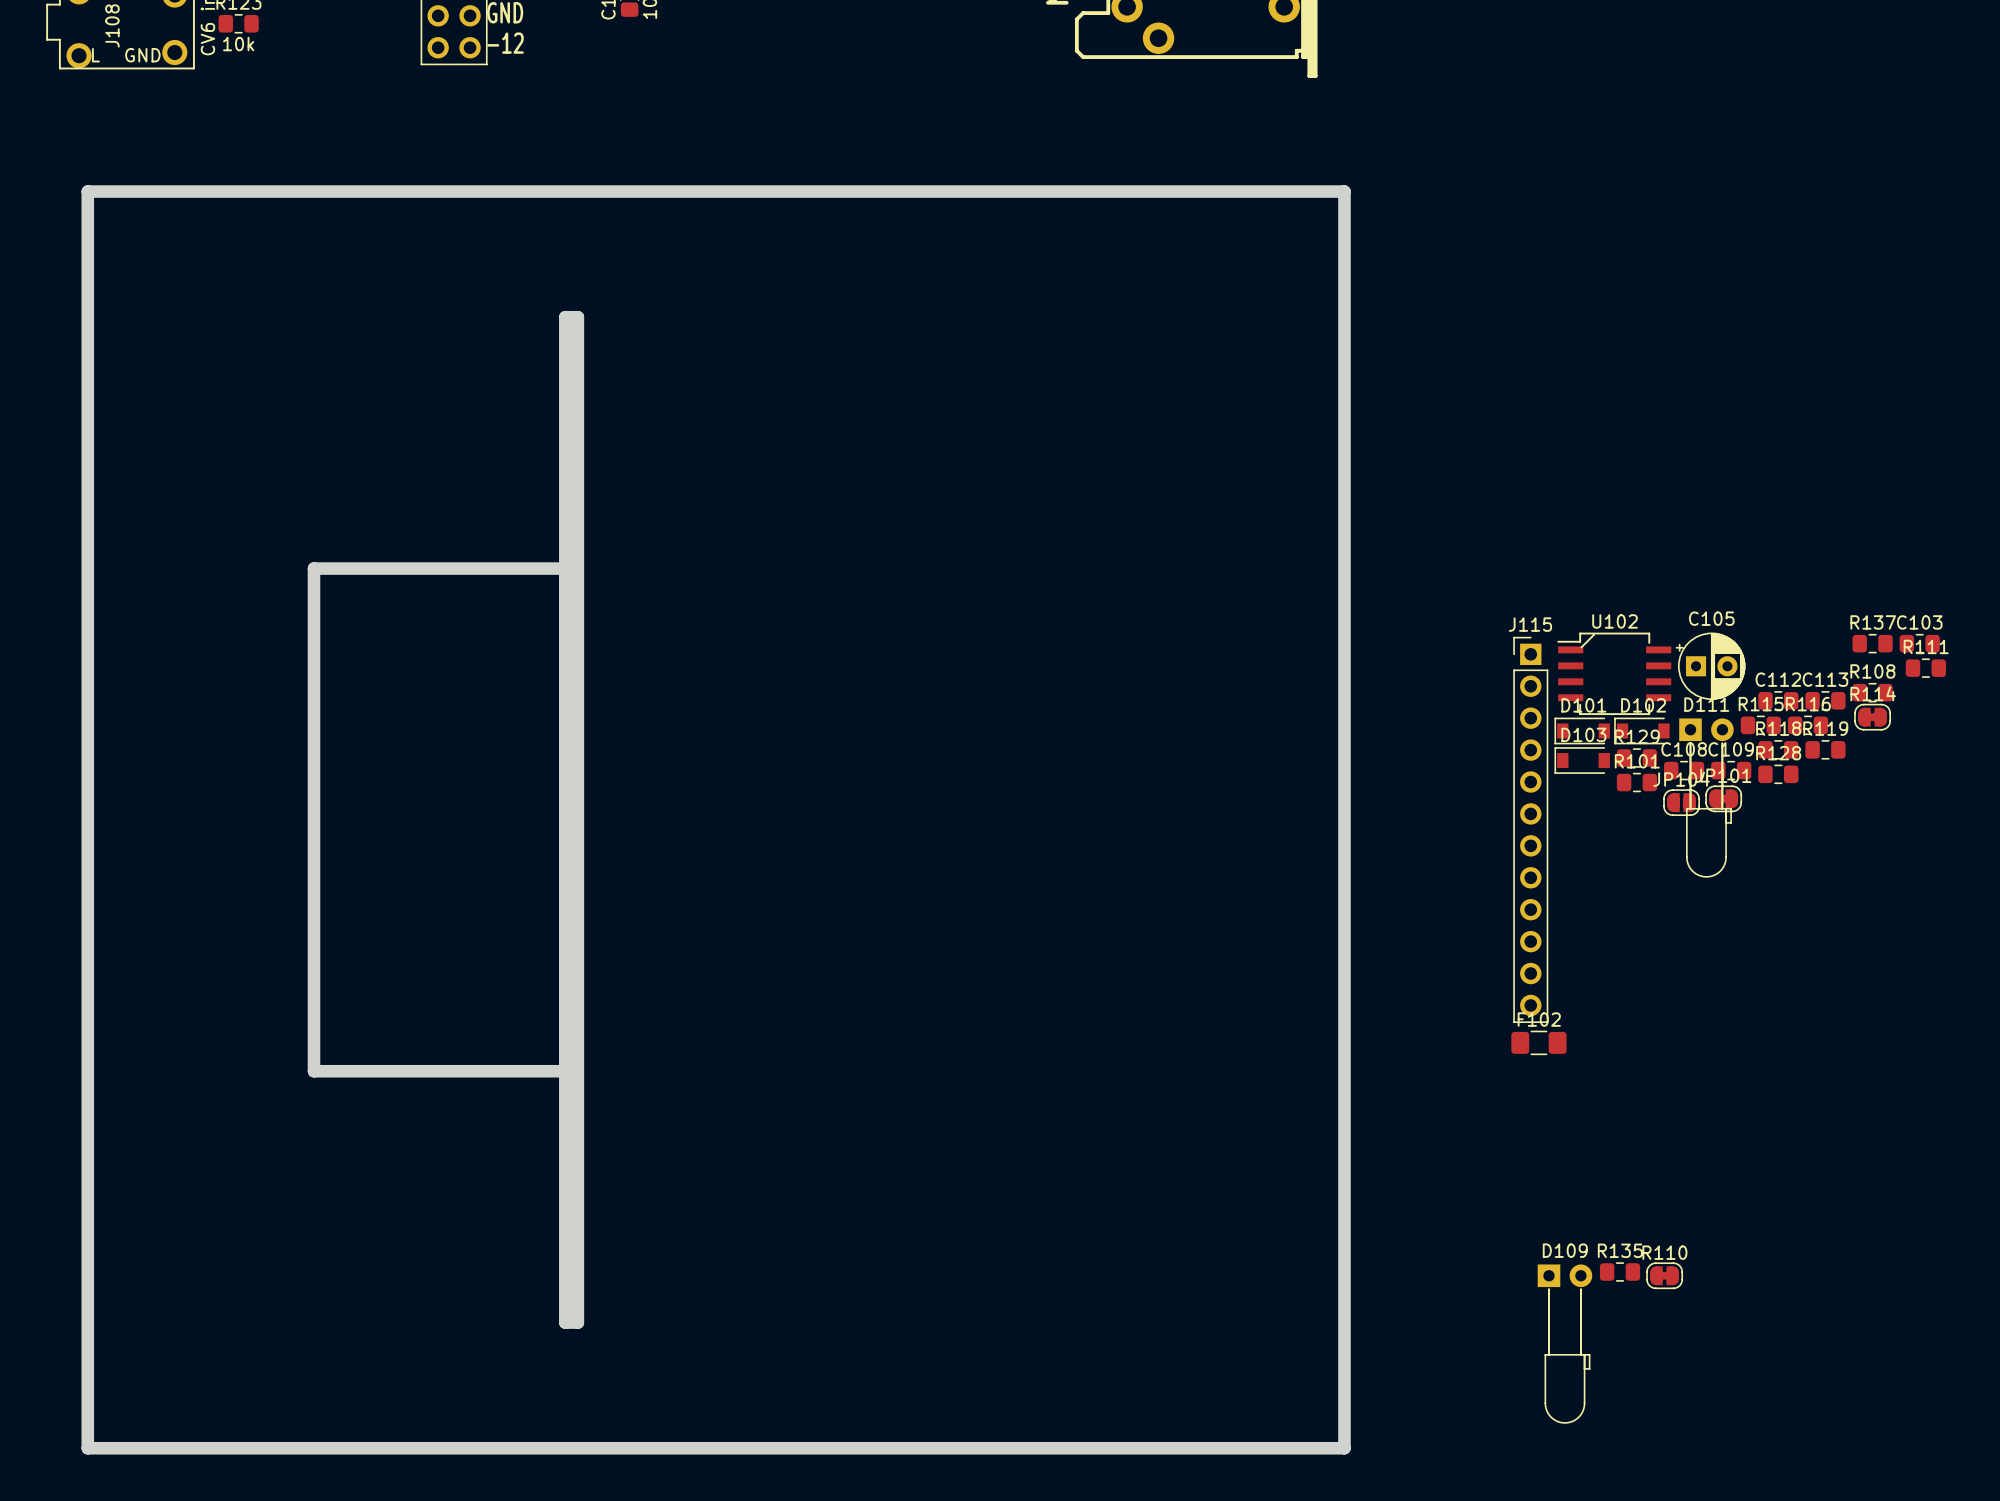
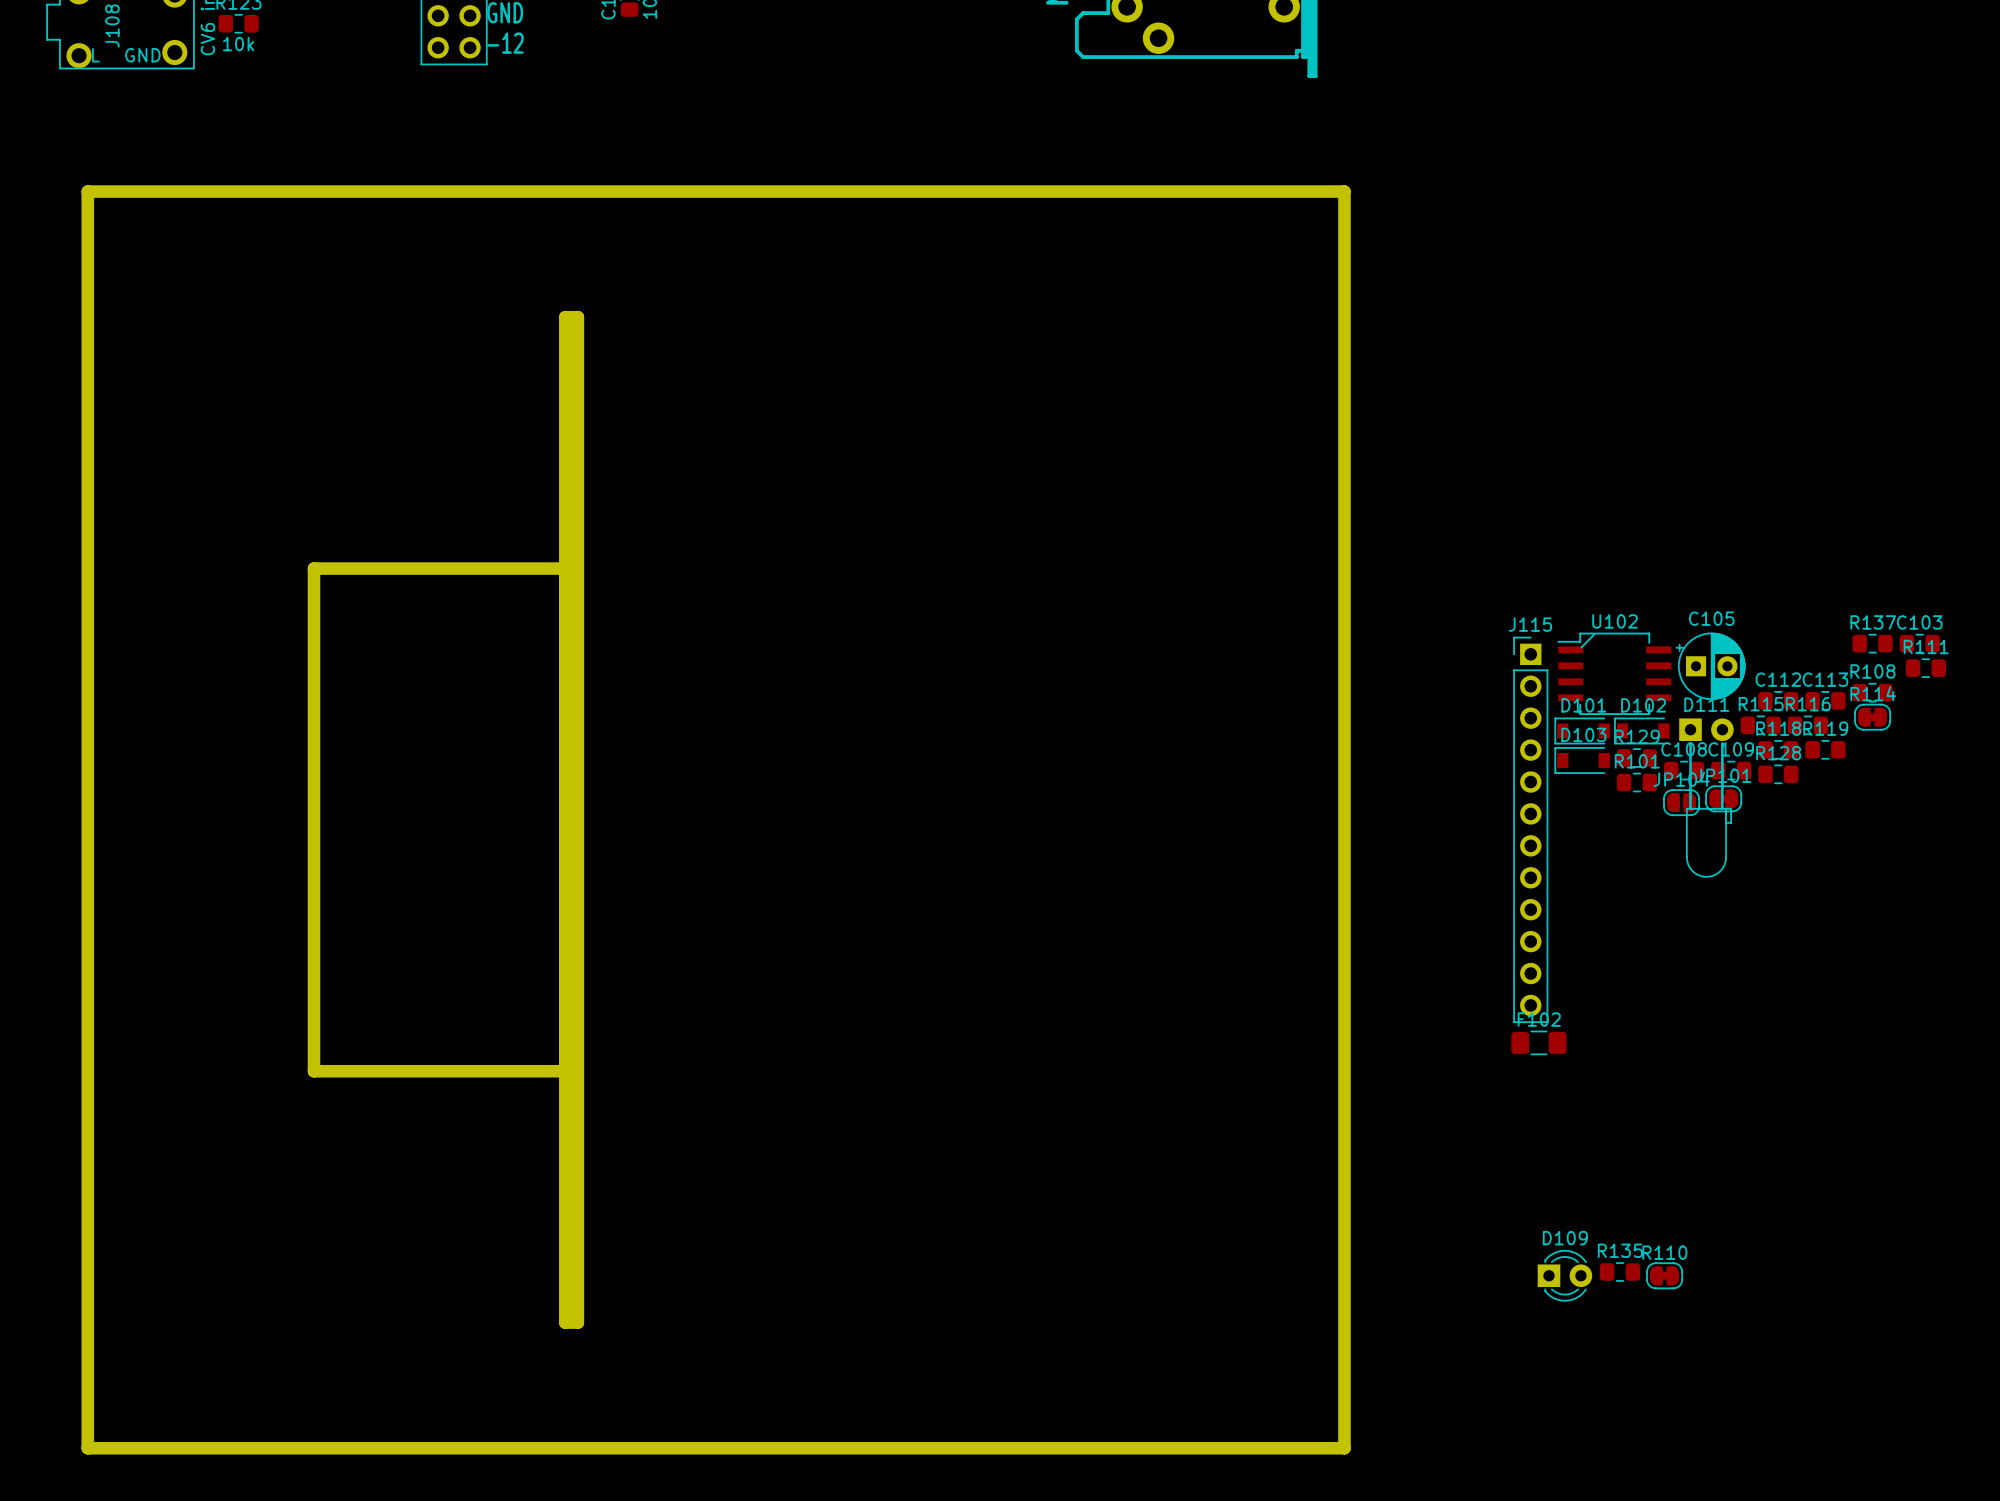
D109 name position: D109 (1565, 1250) -> D109 (1565, 1238)
D109 footprint: [1537, 1264, 1593, 1424] -> [1537, 1250, 1593, 1302]

